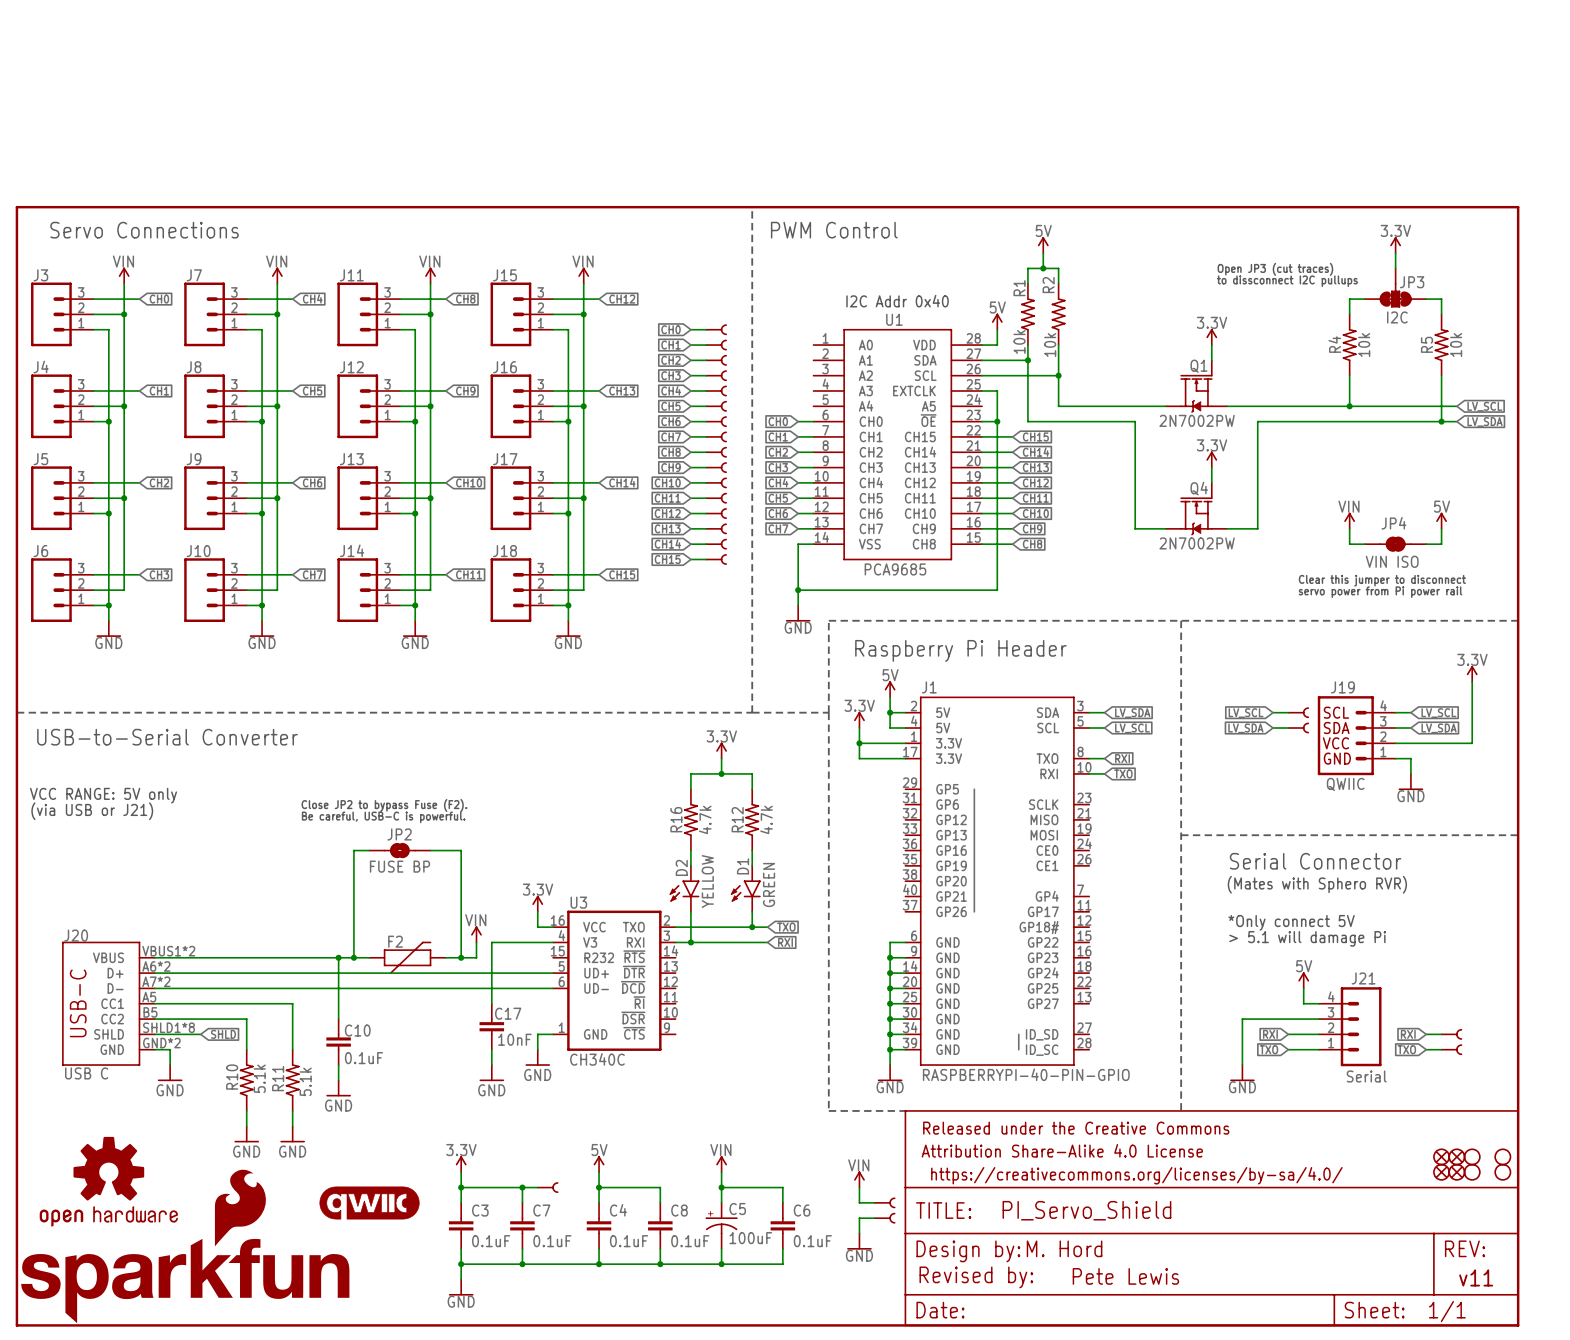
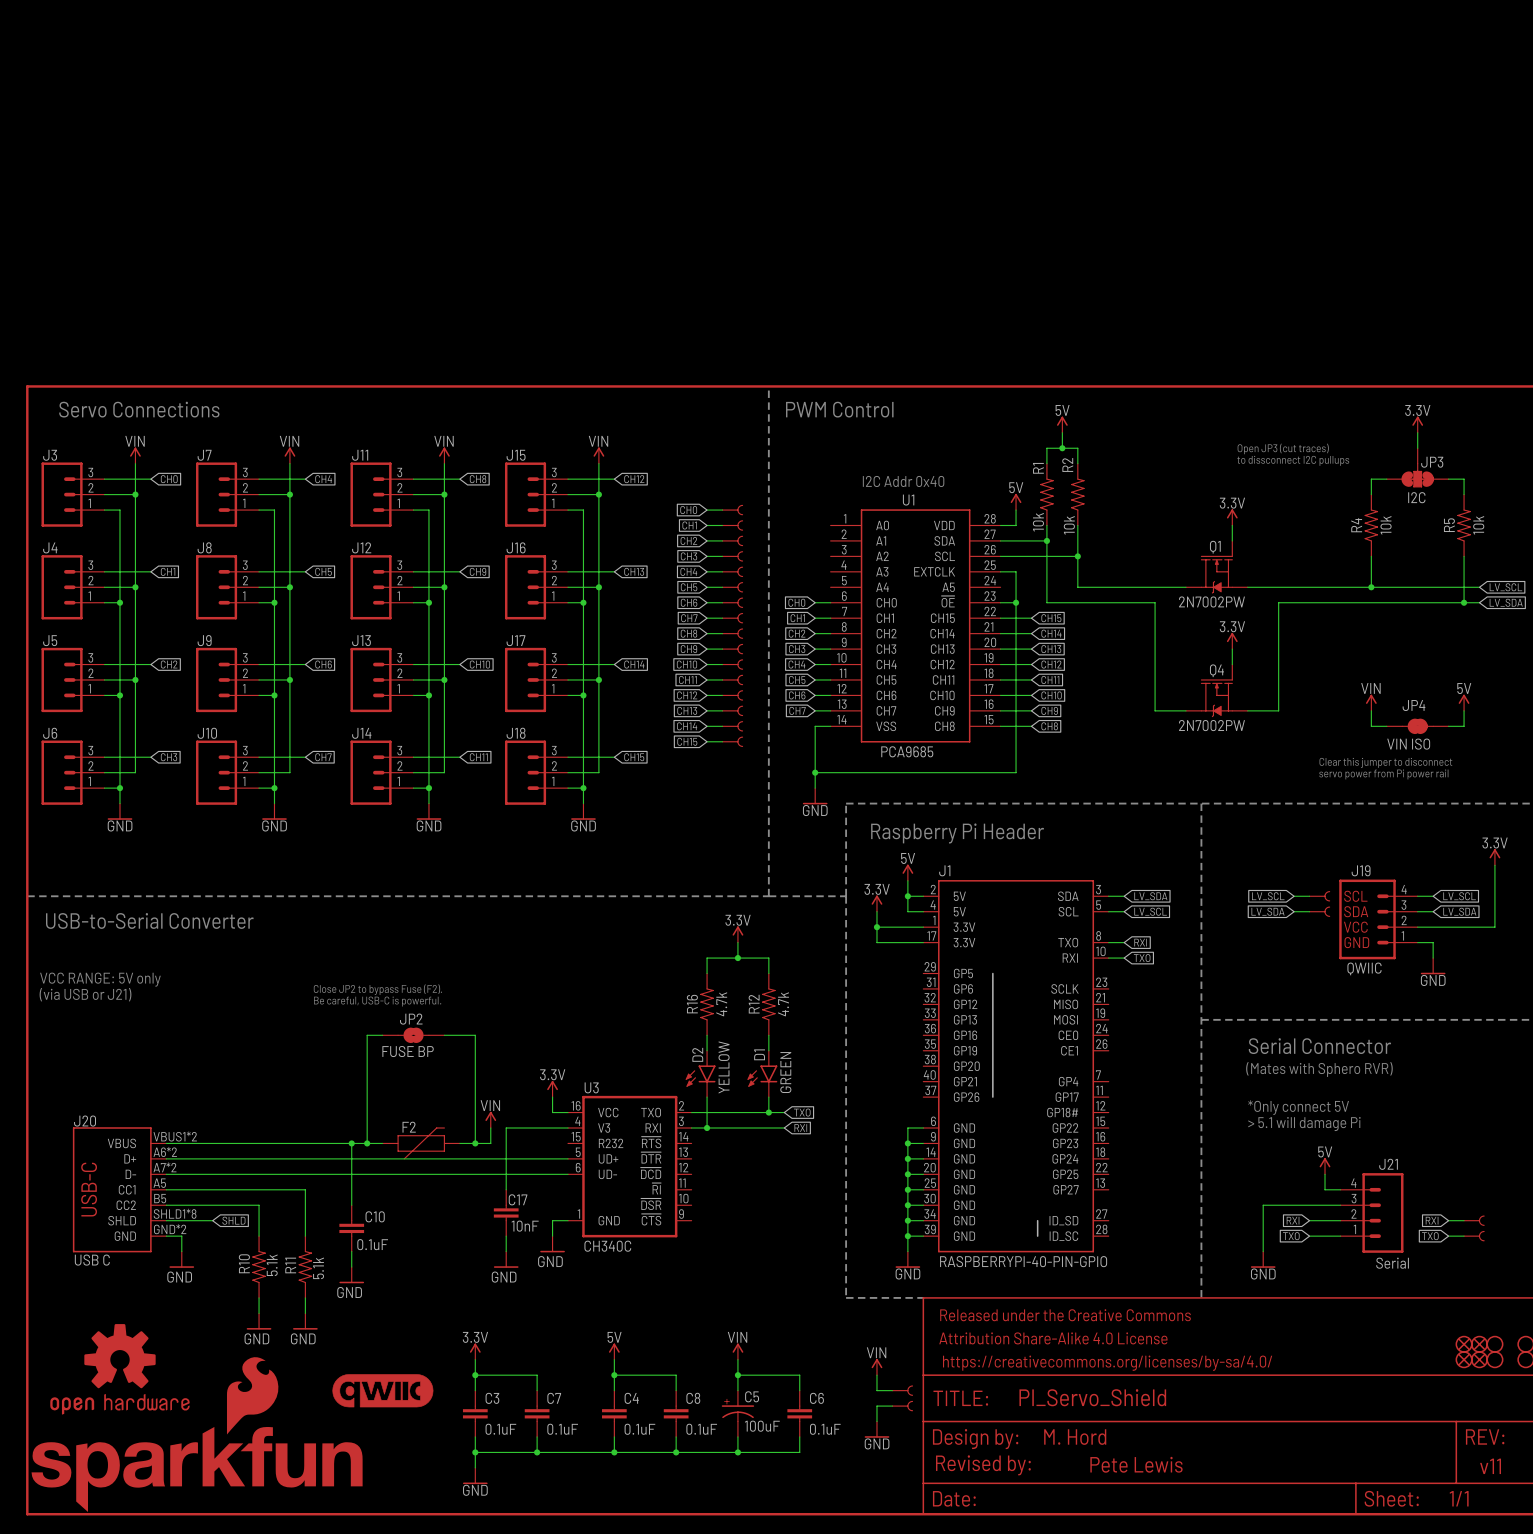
wire: (522, 1187) (537, 1187) -> none
junction: (522, 1187) -> none
part: (547, 1187) -> none

